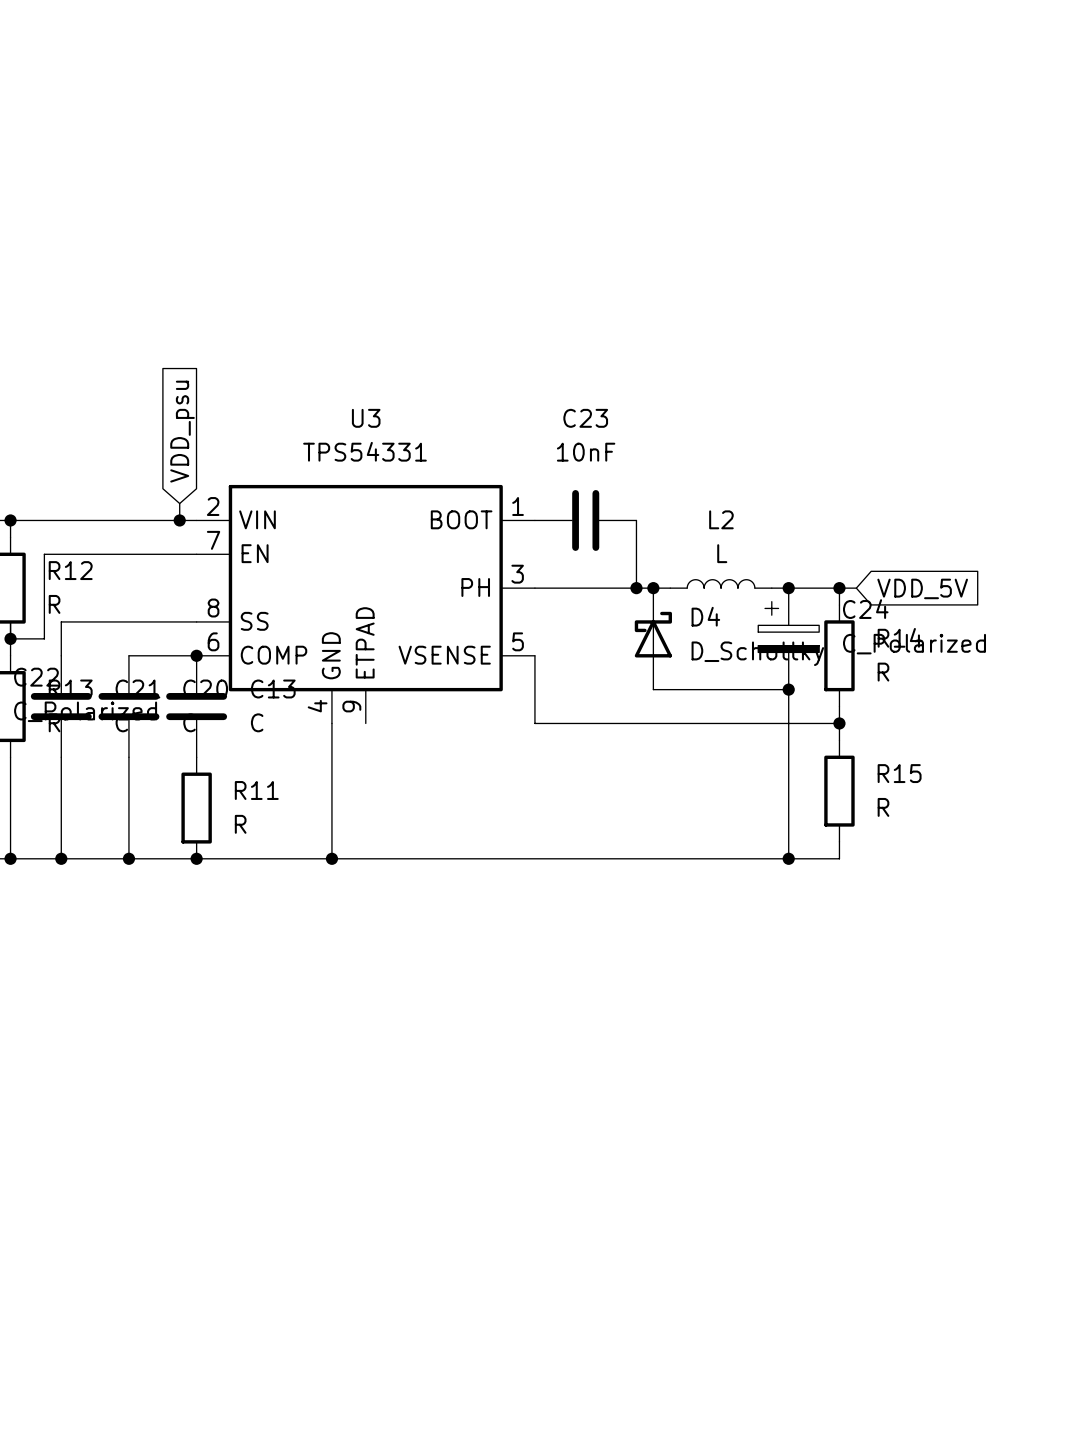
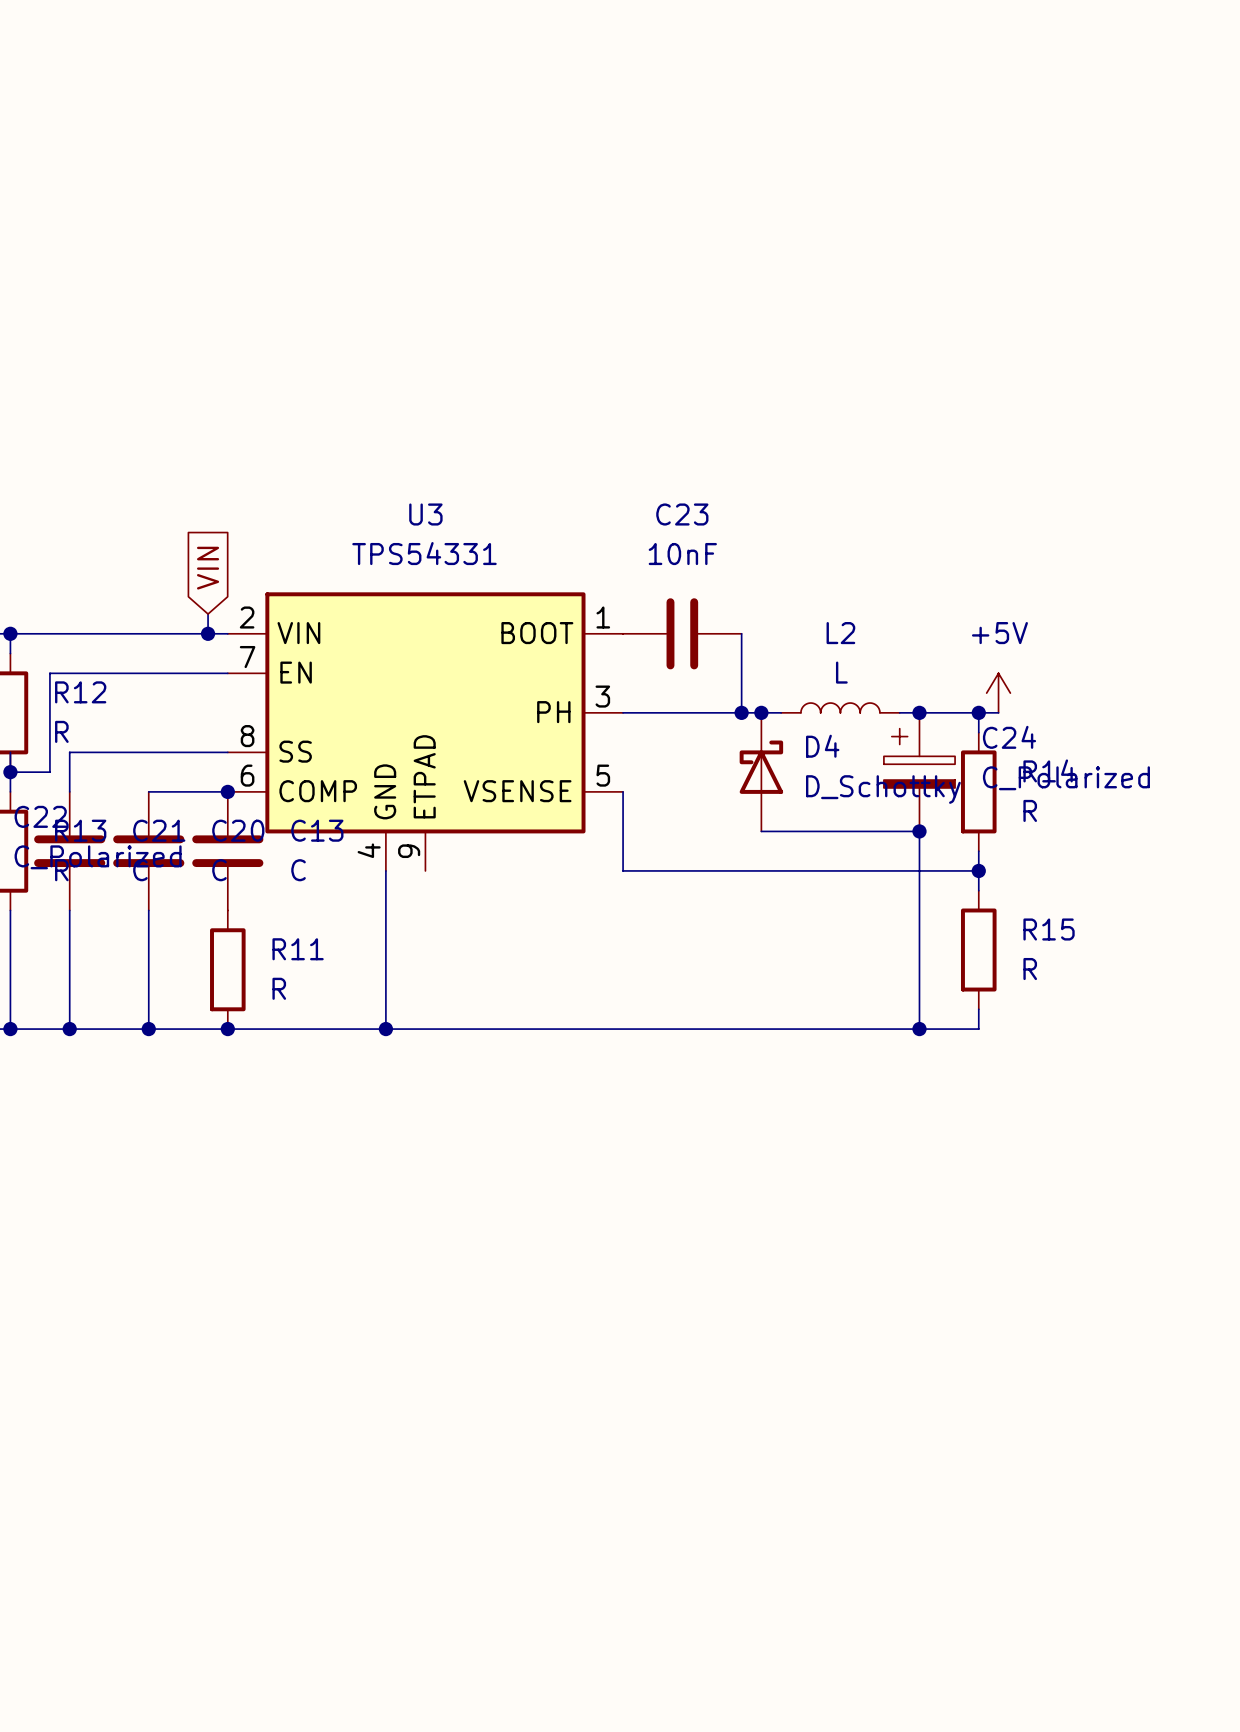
global label: VDD_psu (182, 431) -> VIN (208, 568)
power symbol: none -> +5V (998, 693)
global label: VDD_5V (922, 588) -> none

